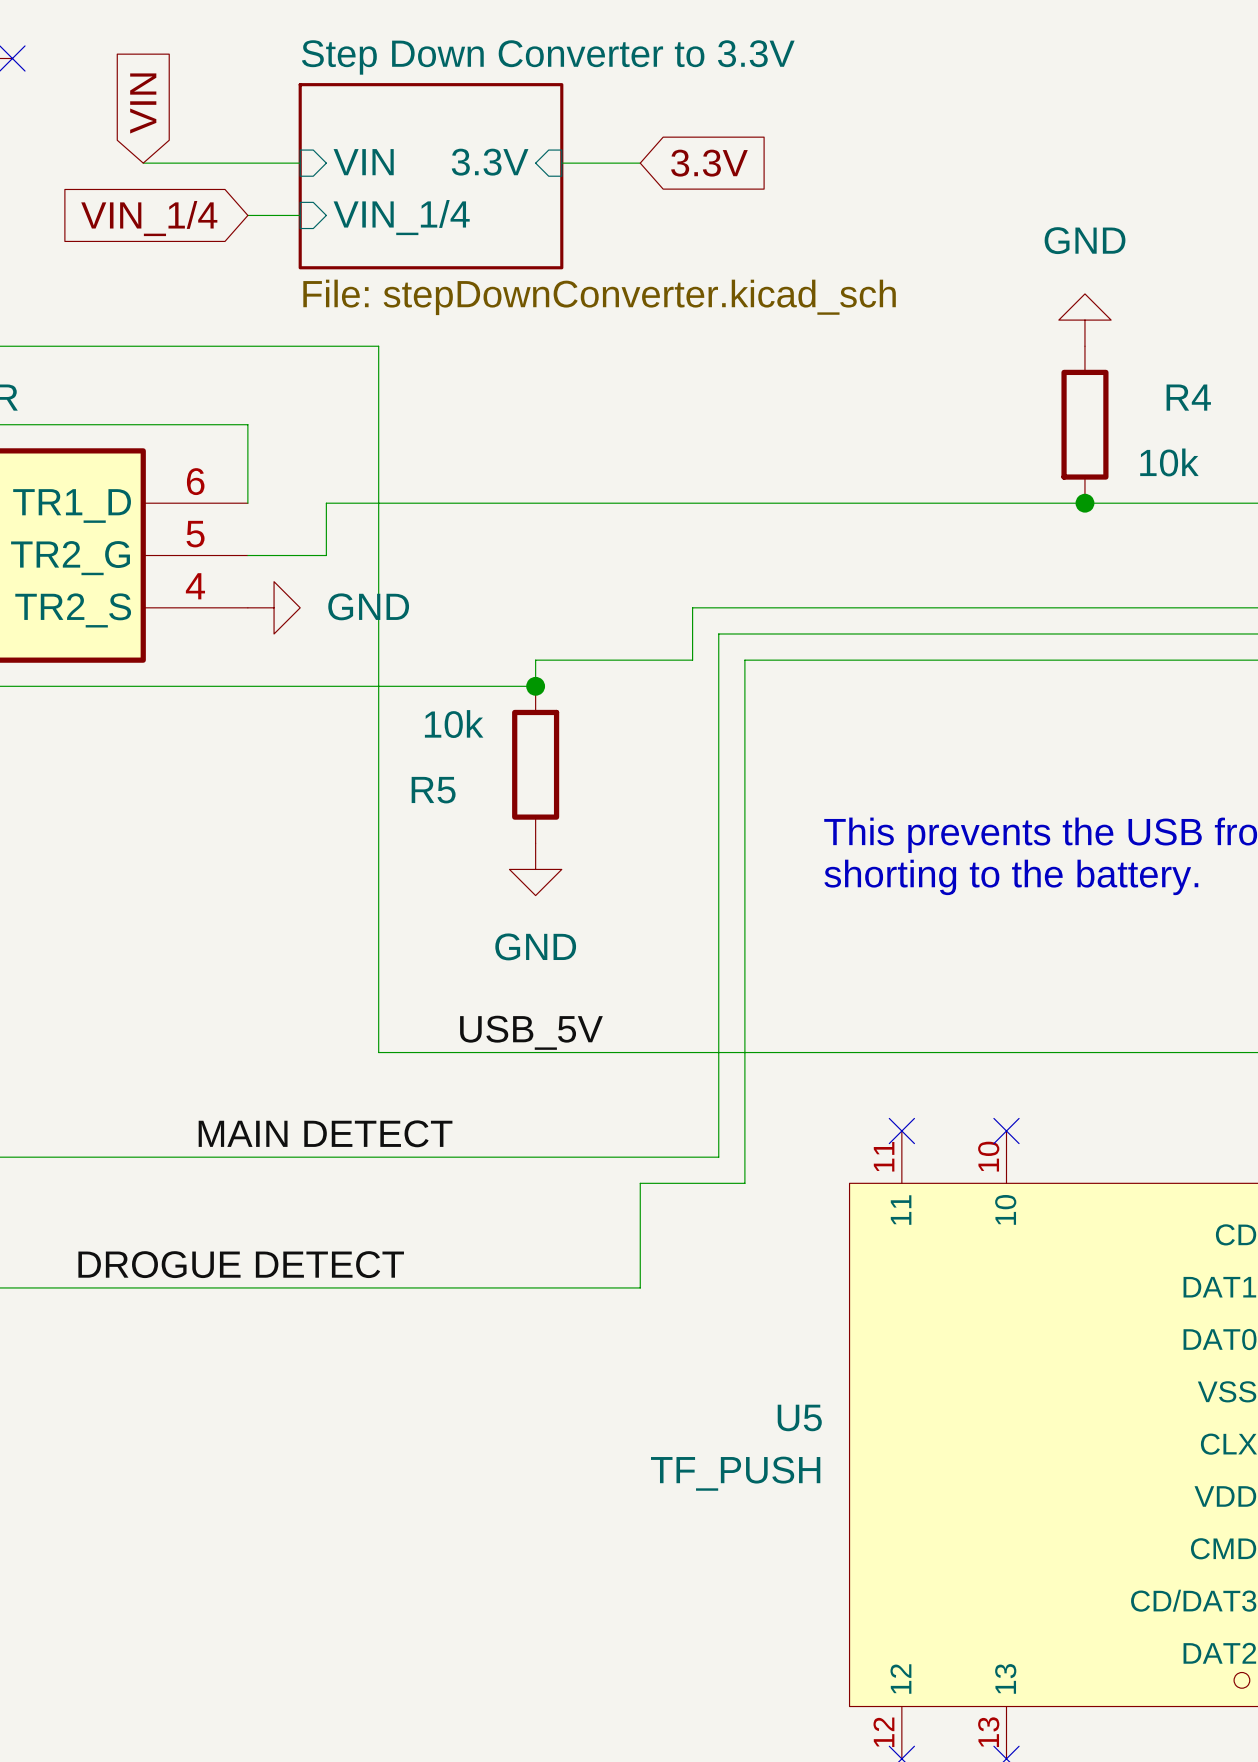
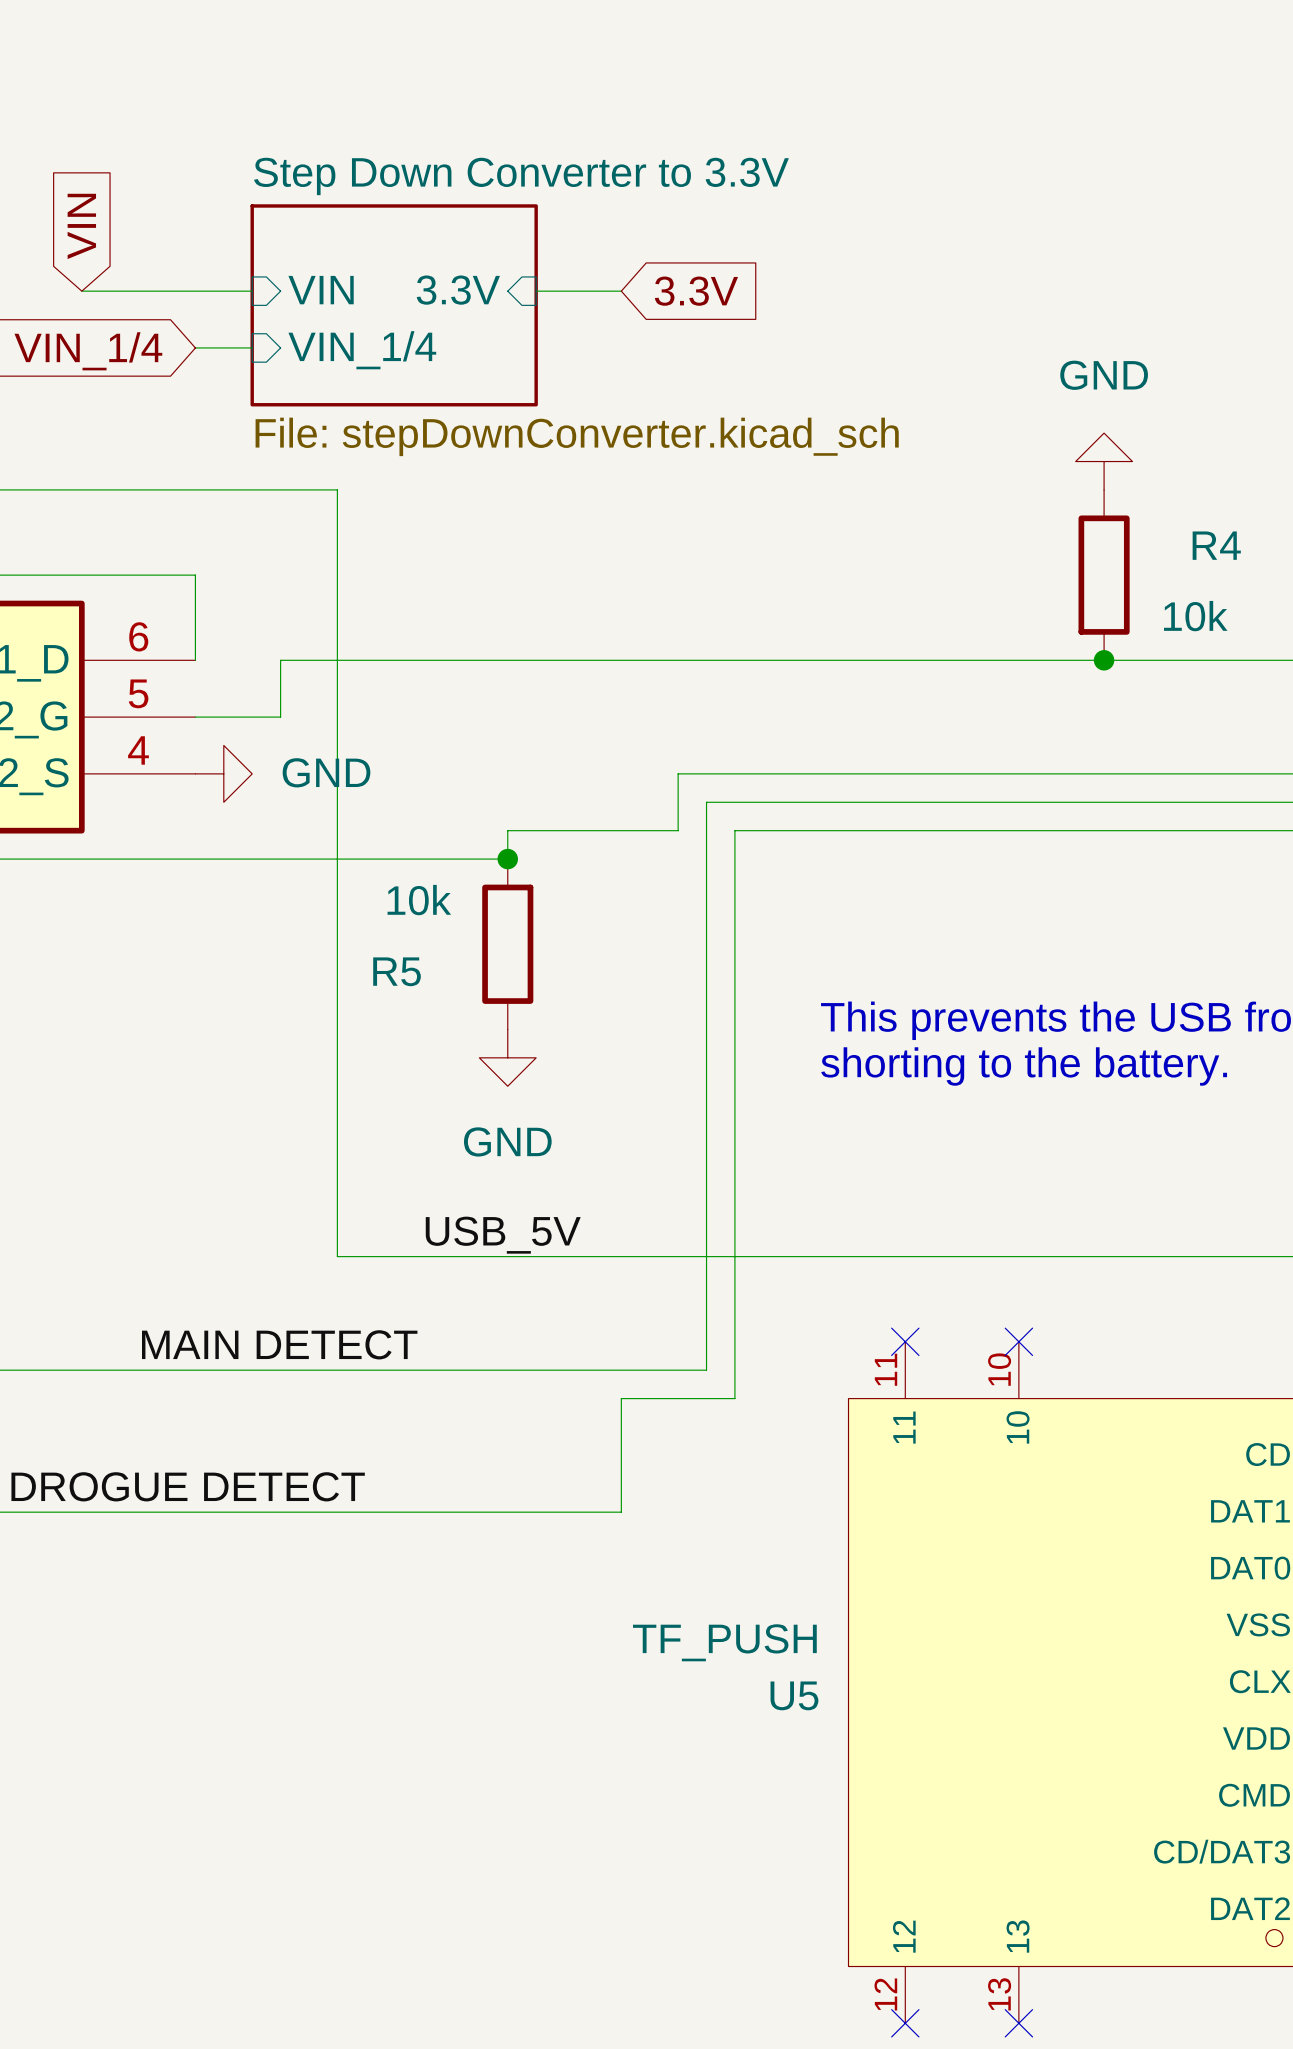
U5 name position: U5 (799, 1417) -> U5 (794, 1695)
U5 value position: TF_PUSH (735, 1473) -> TF_PUSH (724, 1642)

